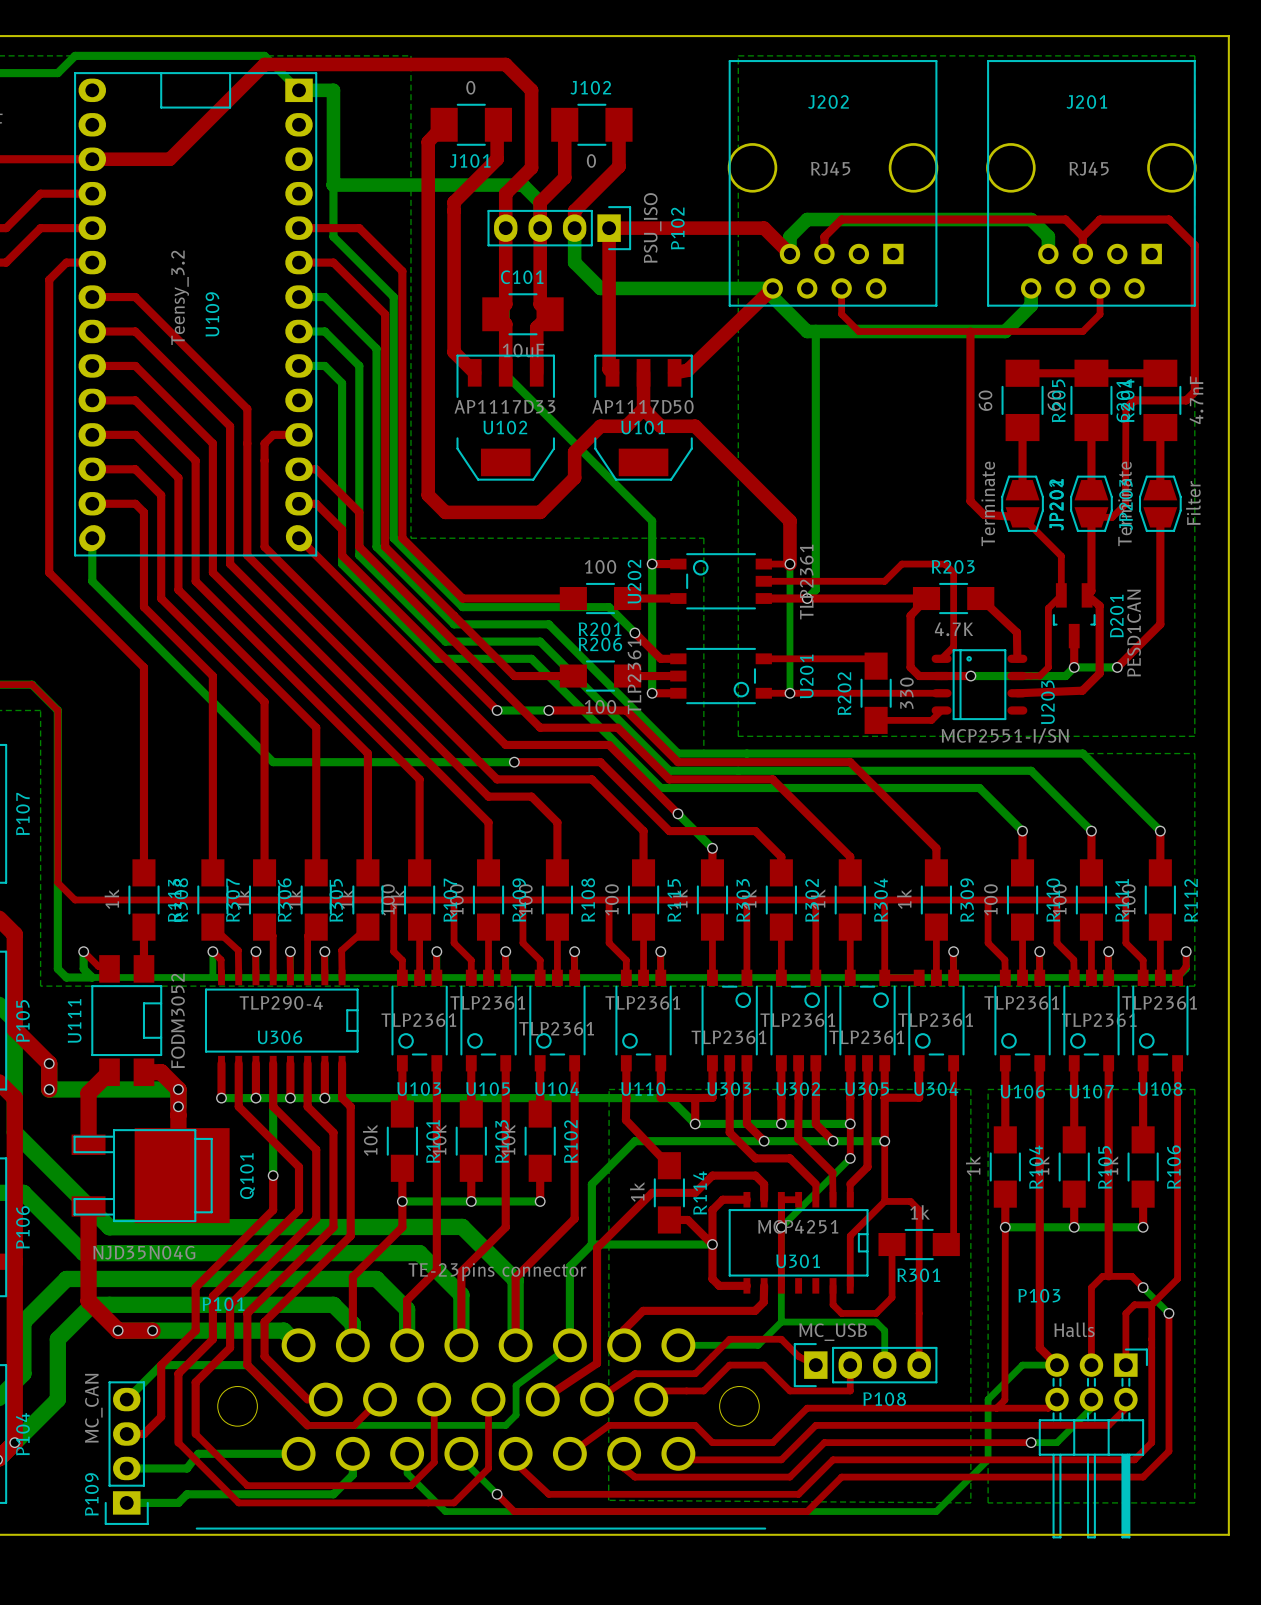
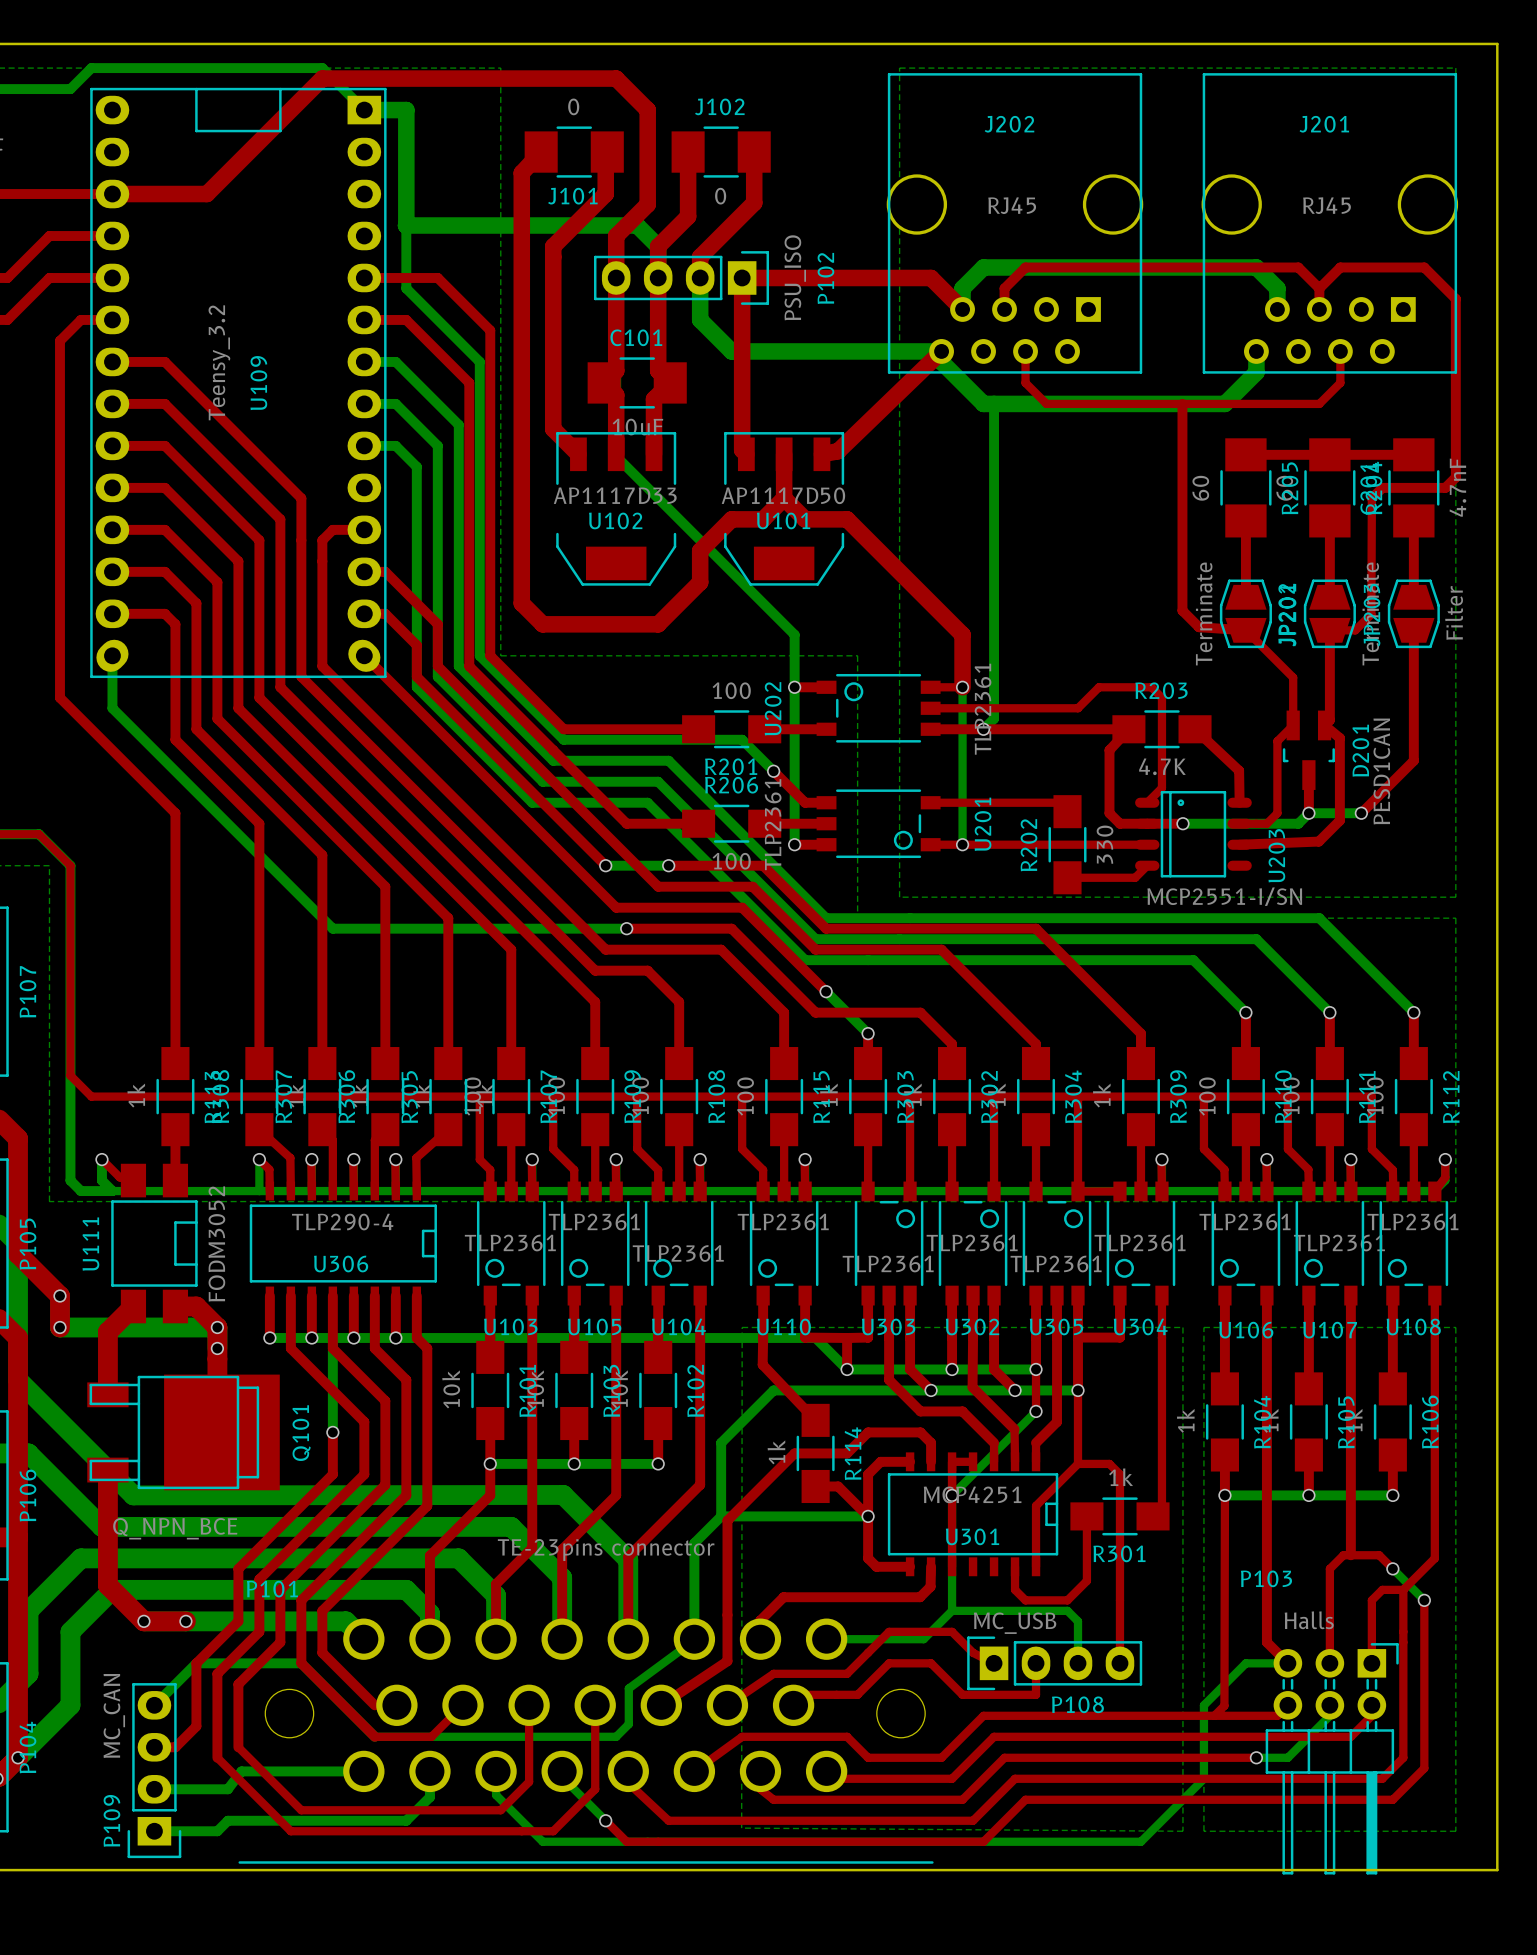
Q101 value: NJD35N04G (144, 1252) -> Q_NPN_BCE (175, 1528)

